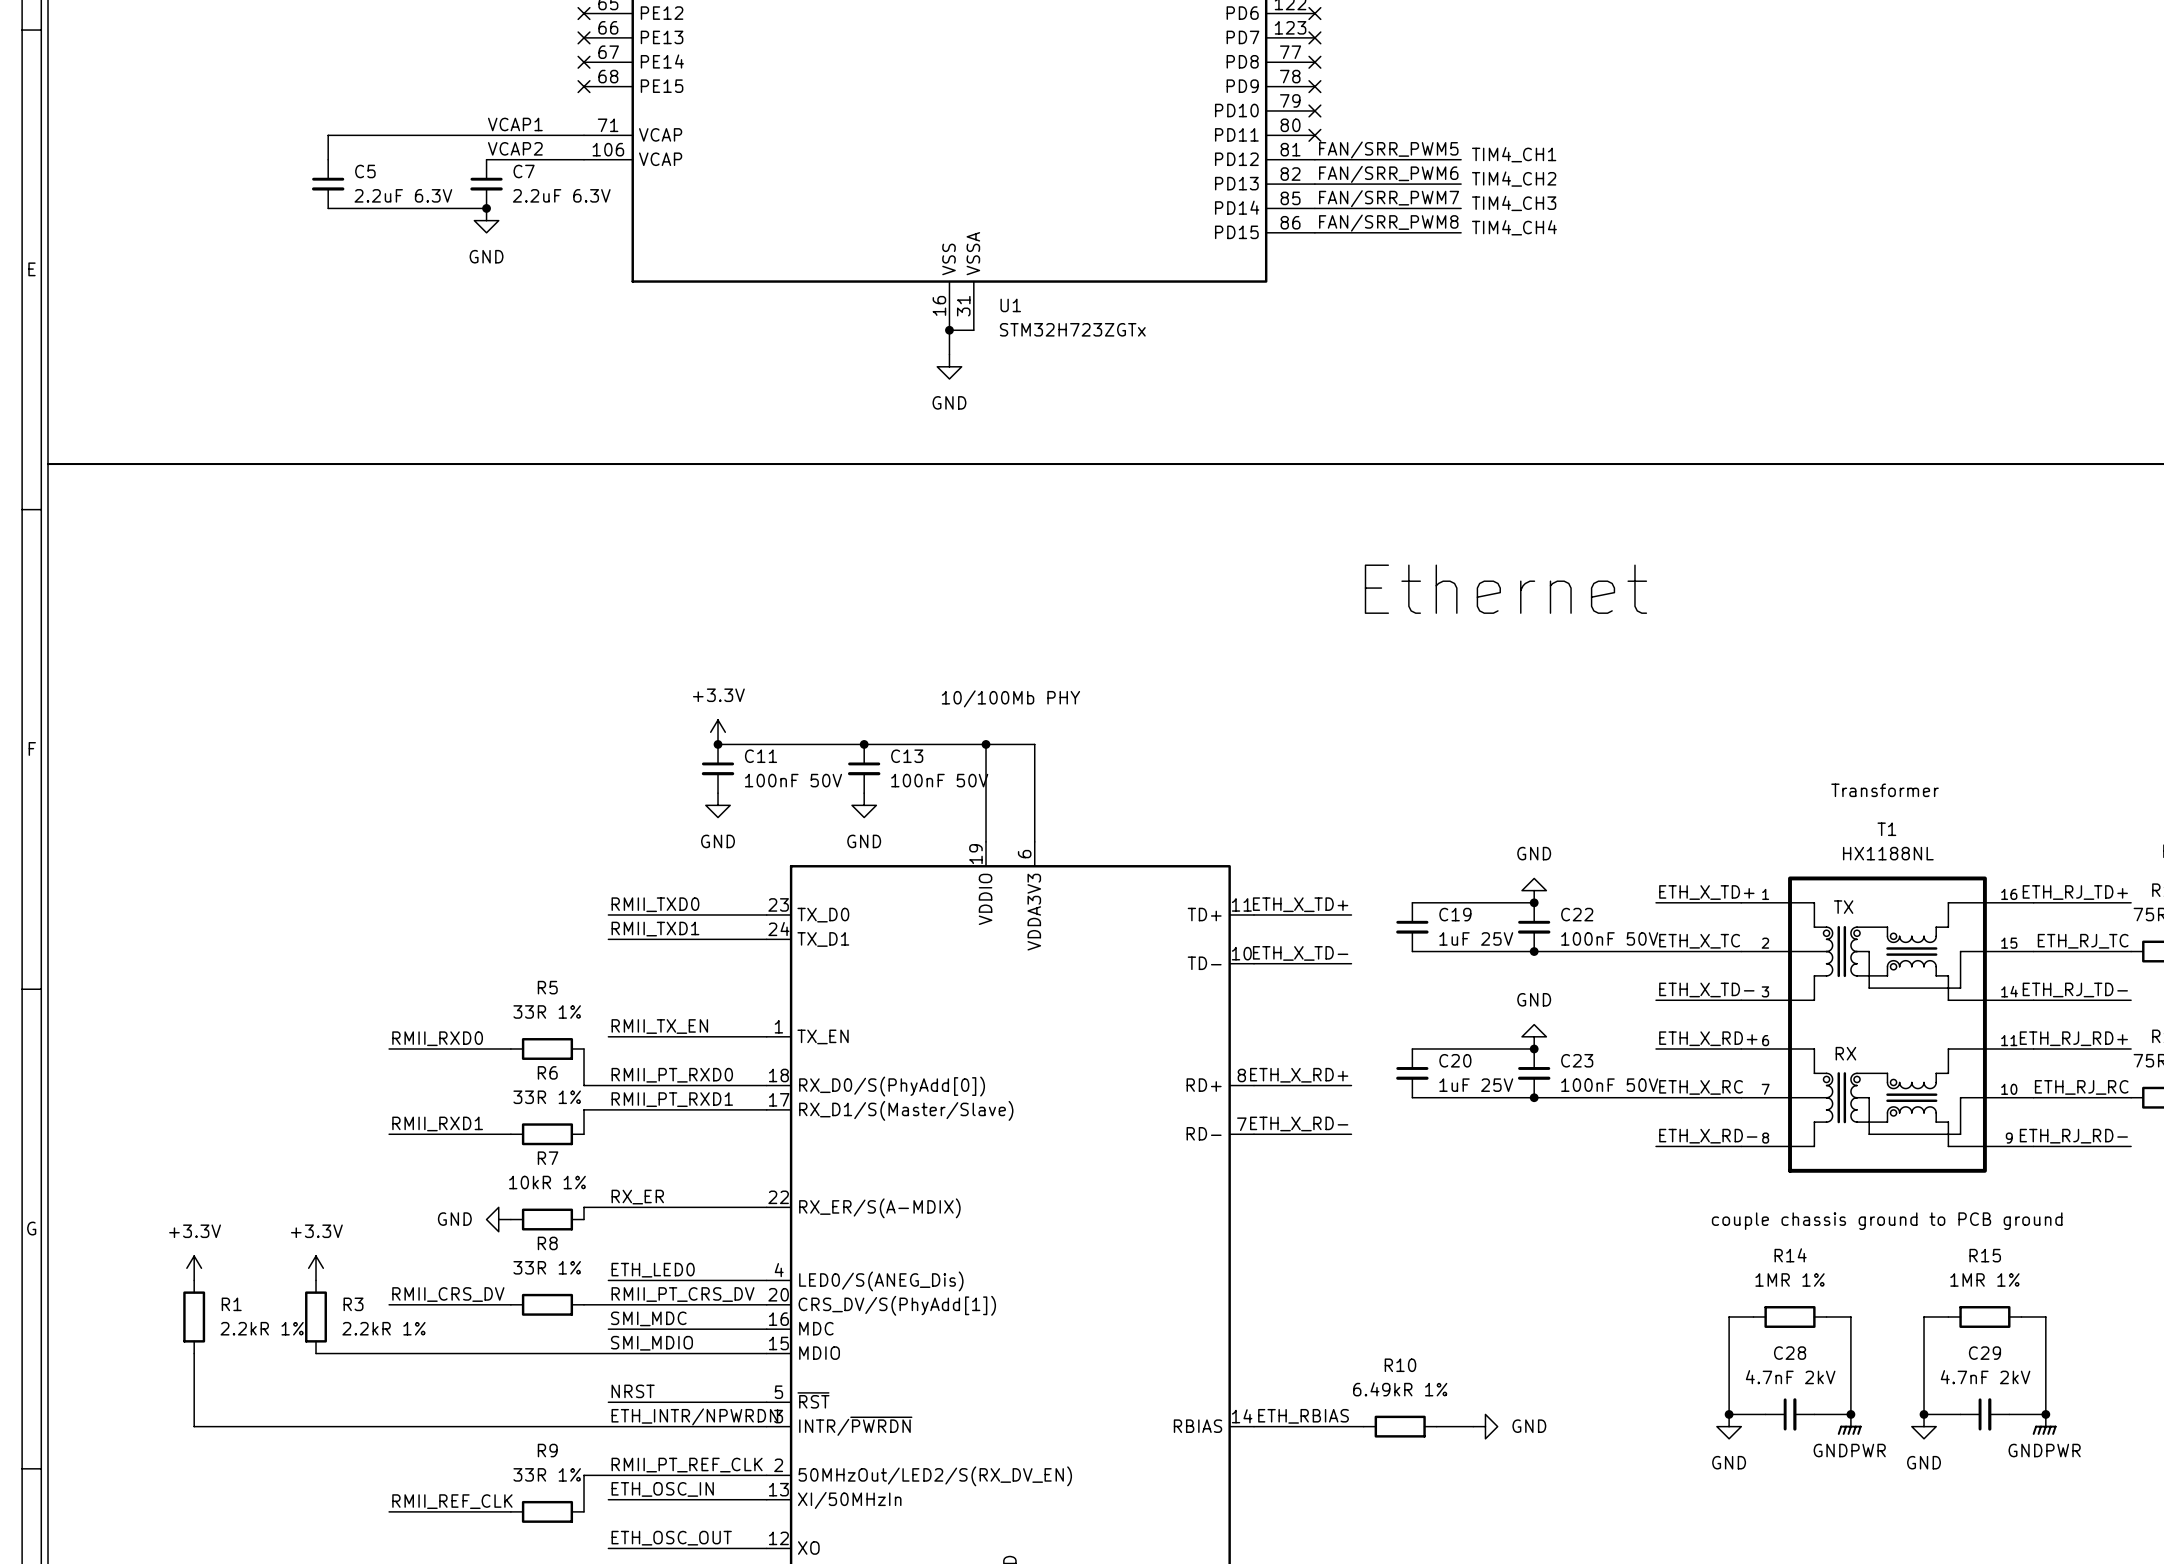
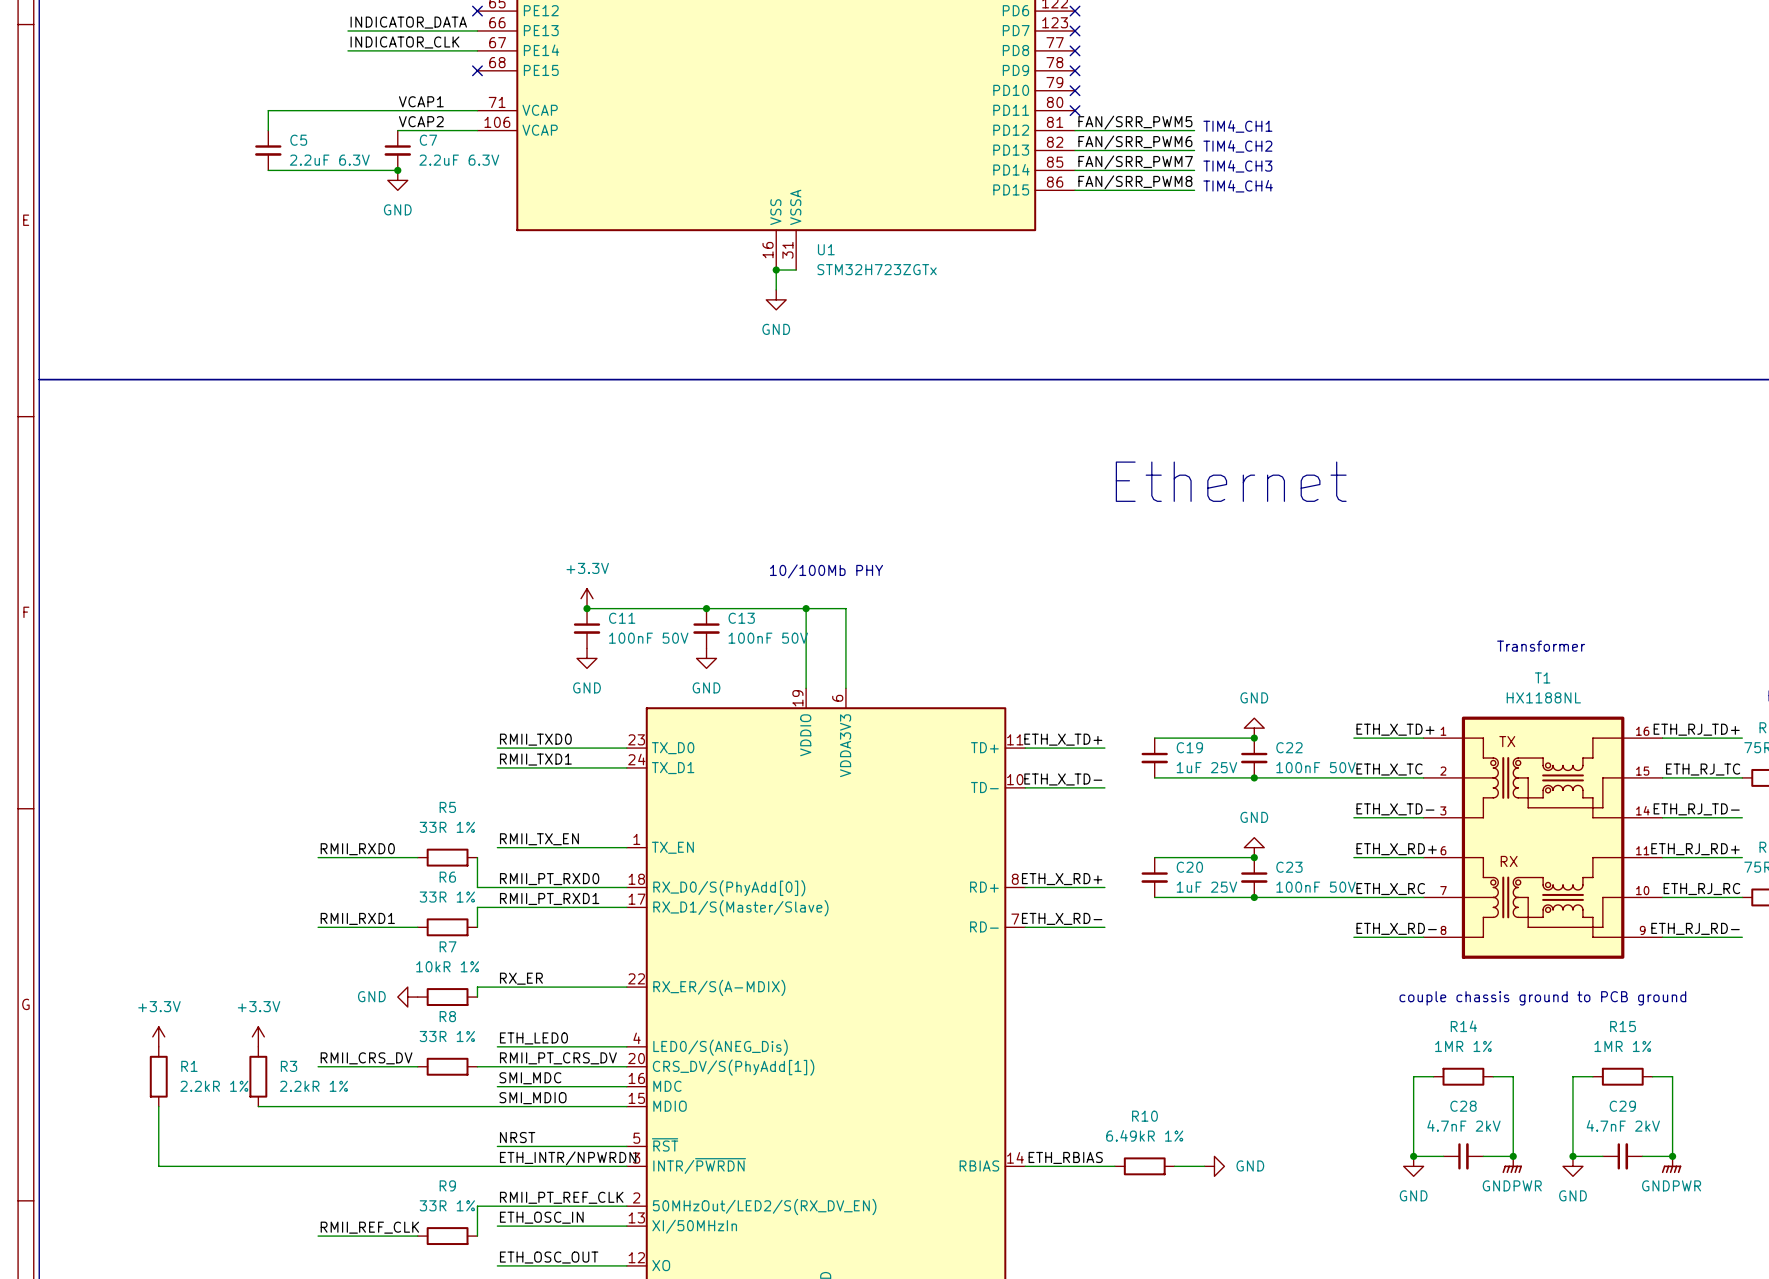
label: none -> INDICATOR_DATA (408, 22)
wire: none -> (347, 30) (477, 30)
no-connect mark: (584, 37) -> none
label: none -> INDICATOR_CLK (404, 42)
wire: none -> (347, 50) (477, 50)
no-connect mark: (584, 62) -> none

